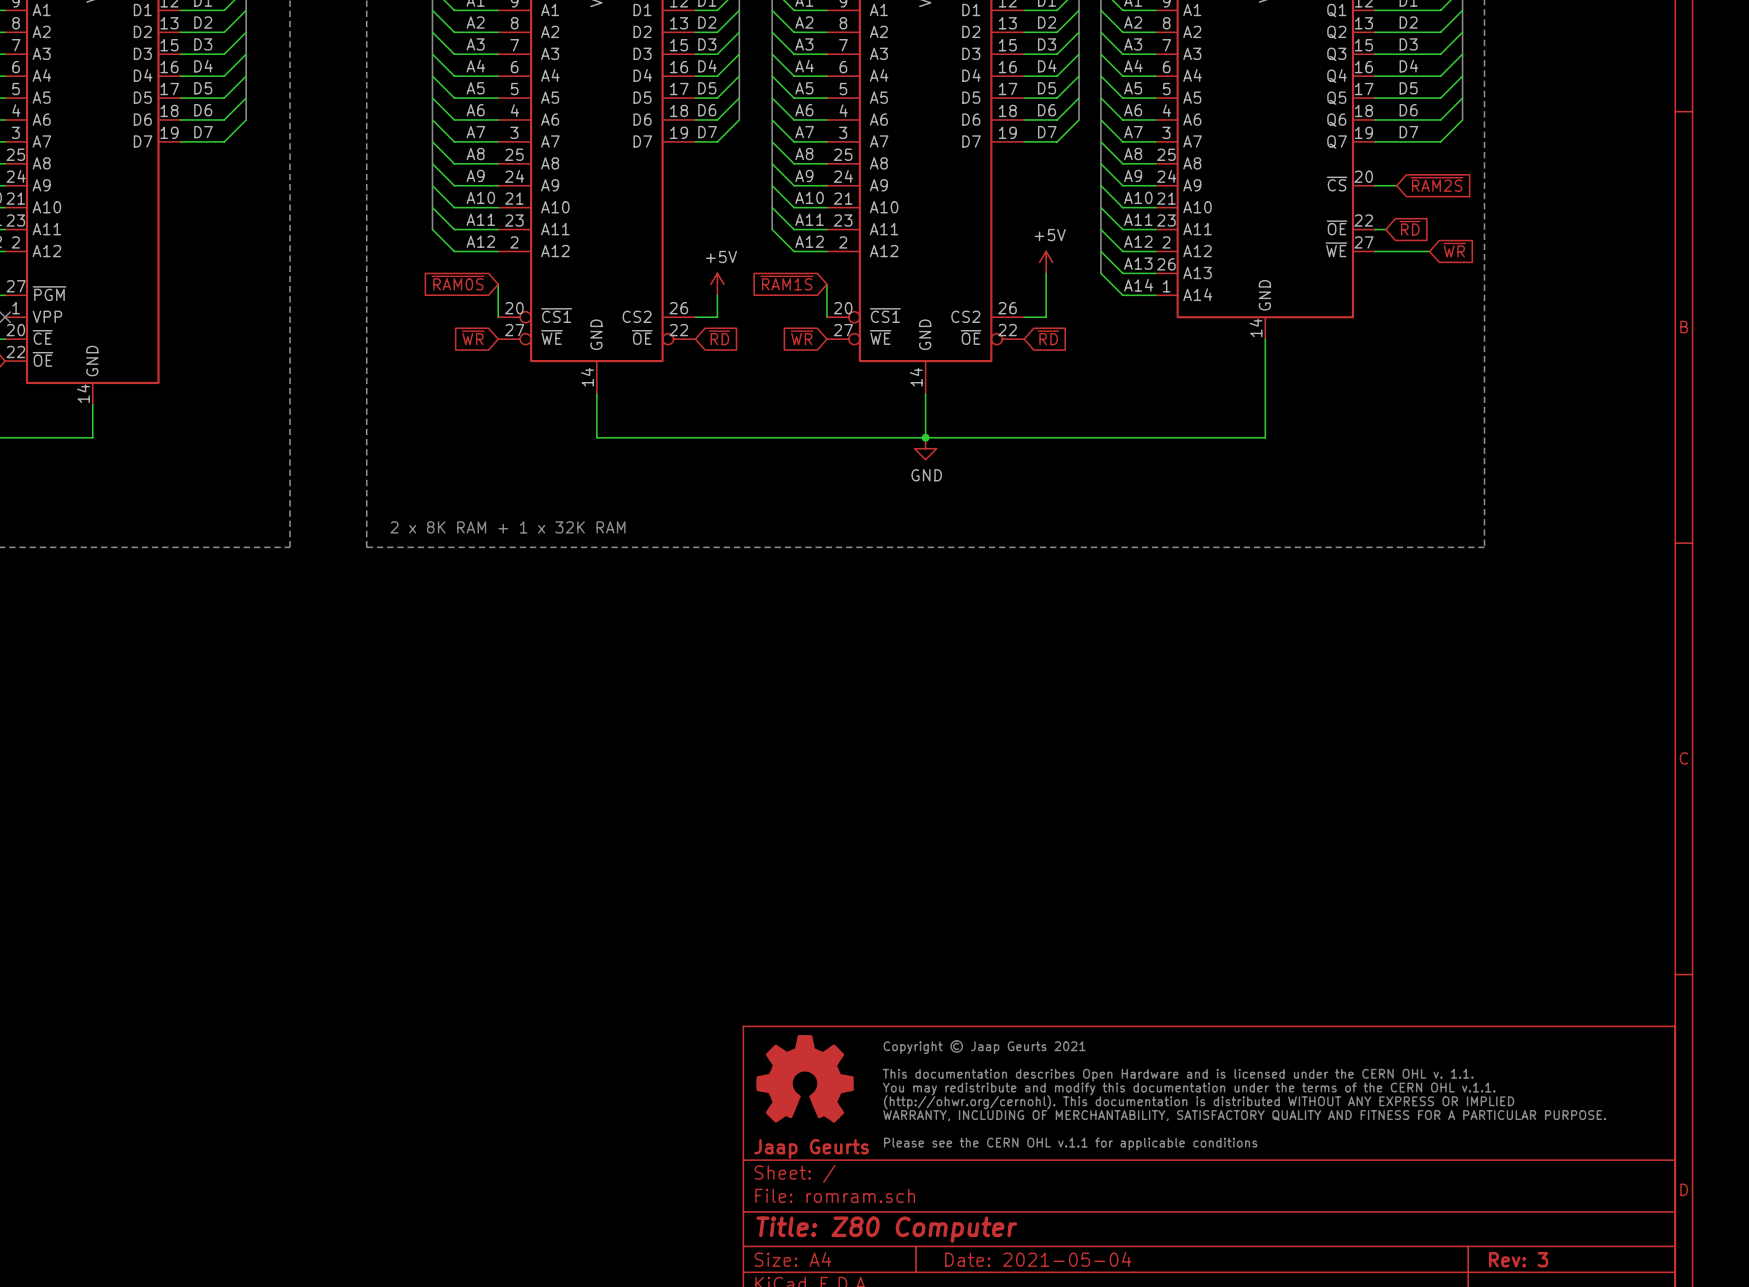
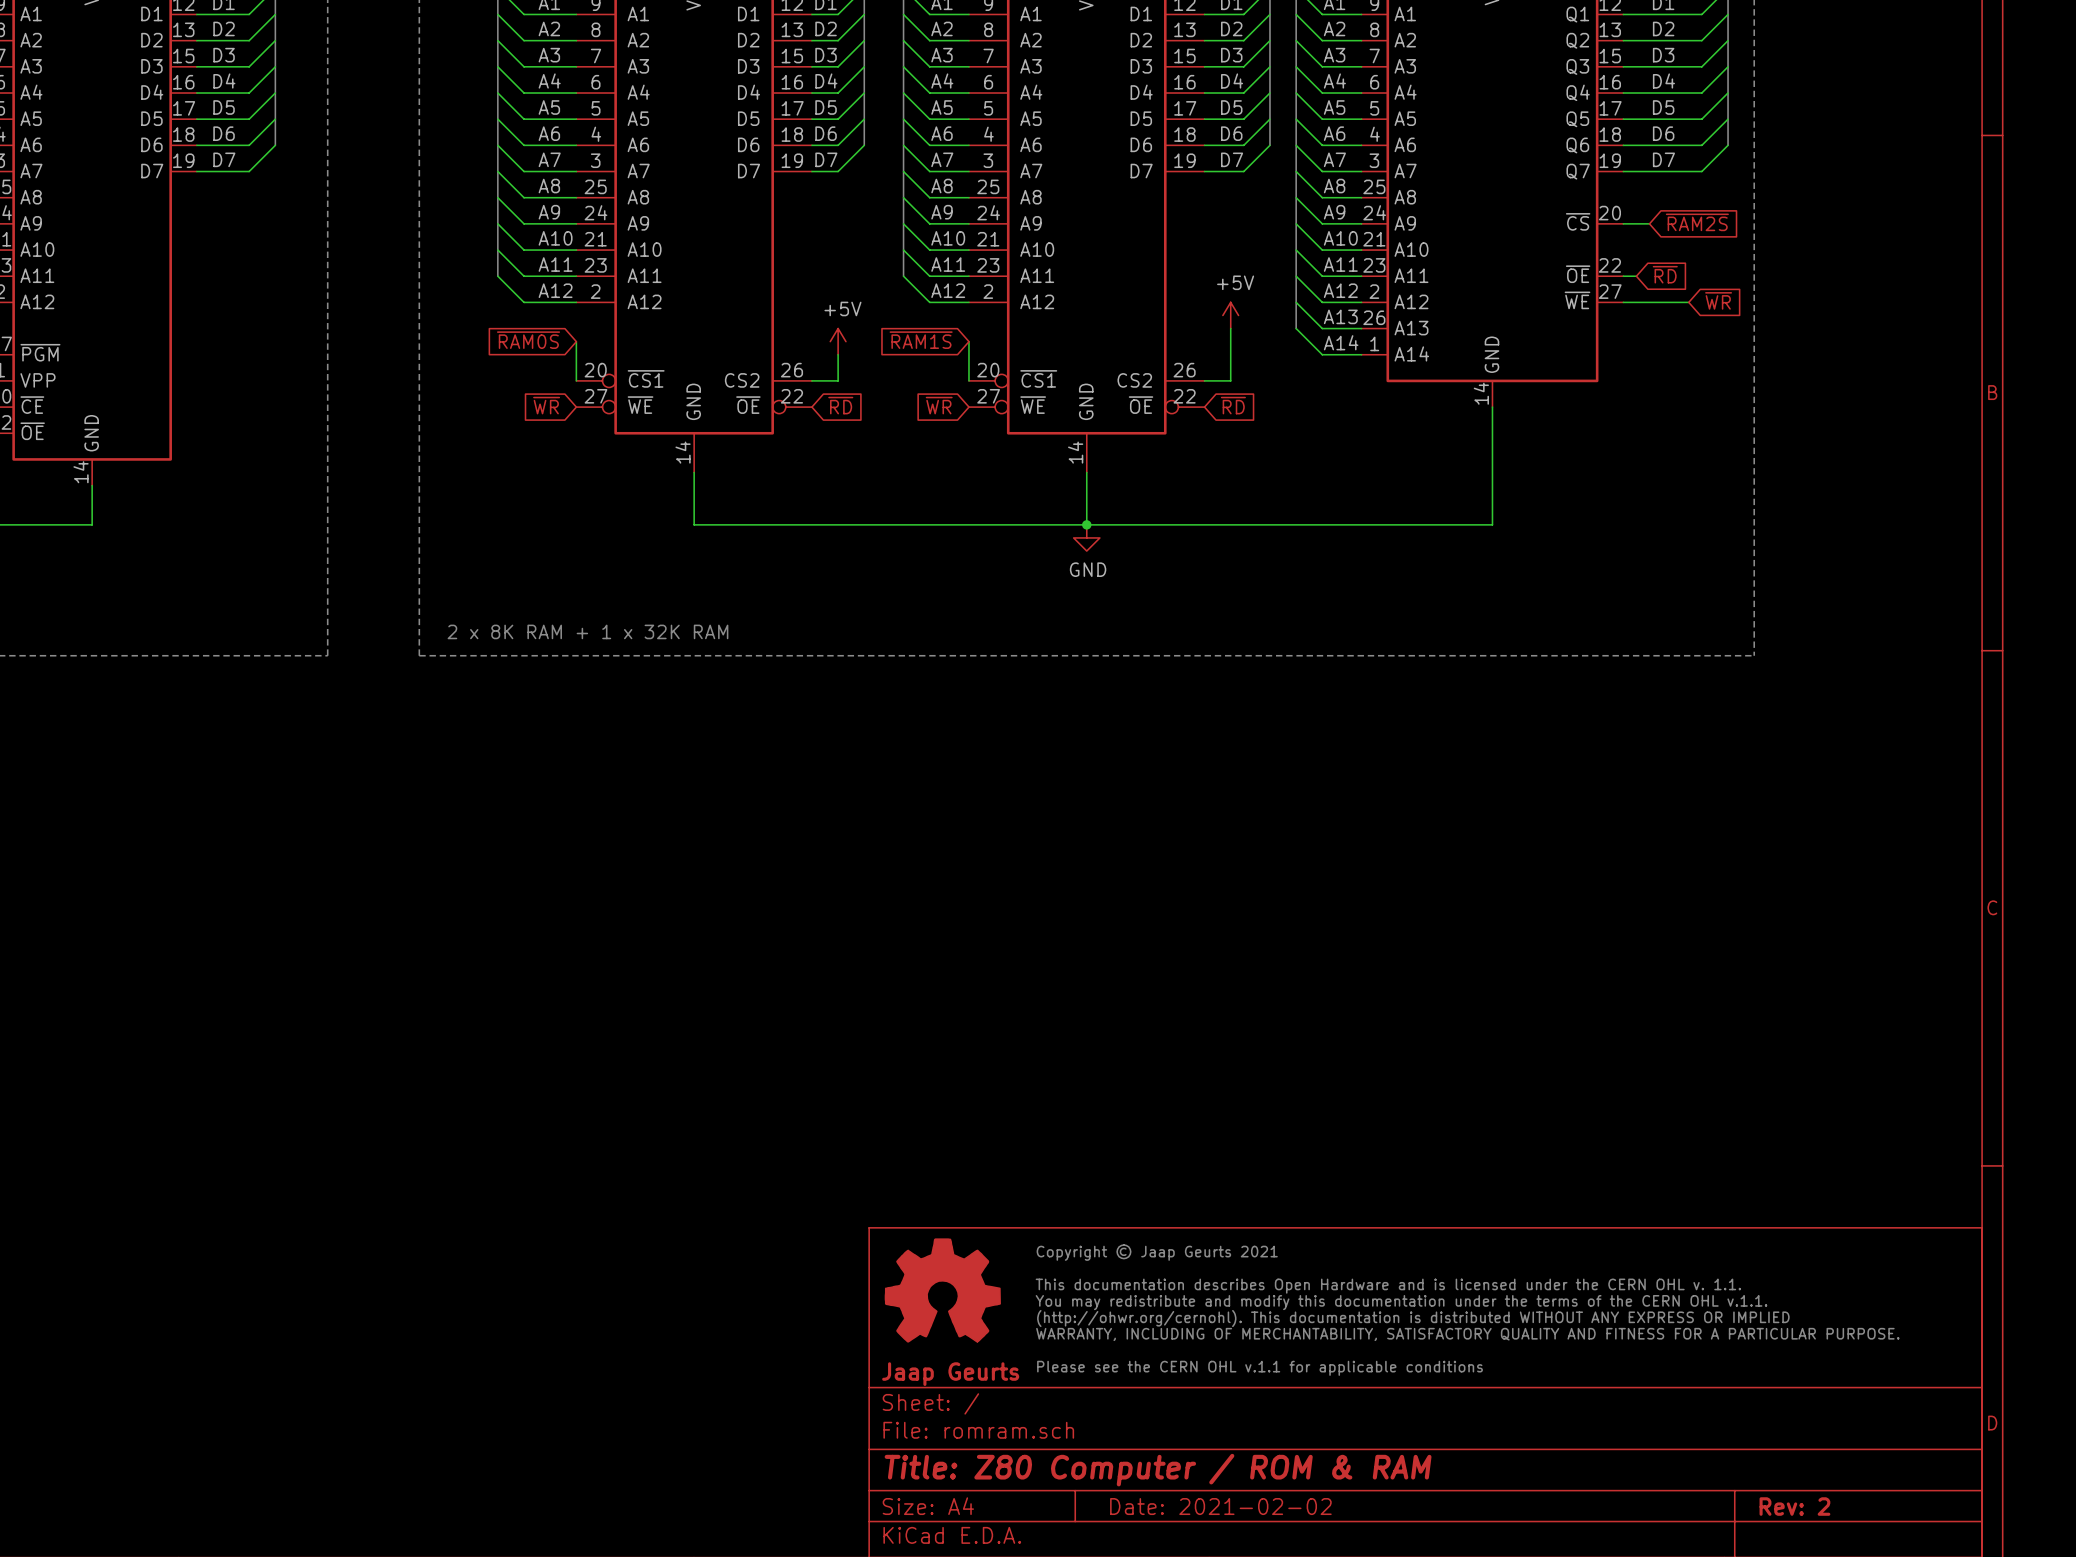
title block: Title: Z80 Computer (886, 1229) -> Title: Z80 Computer / ROM & RAM (1158, 1470)
title block: Date: 2021-05-04 (1038, 1259) -> Date: 2021-02-02 (1220, 1506)
title block: Rev: 3 (1518, 1259) -> Rev: 2 (1794, 1506)

